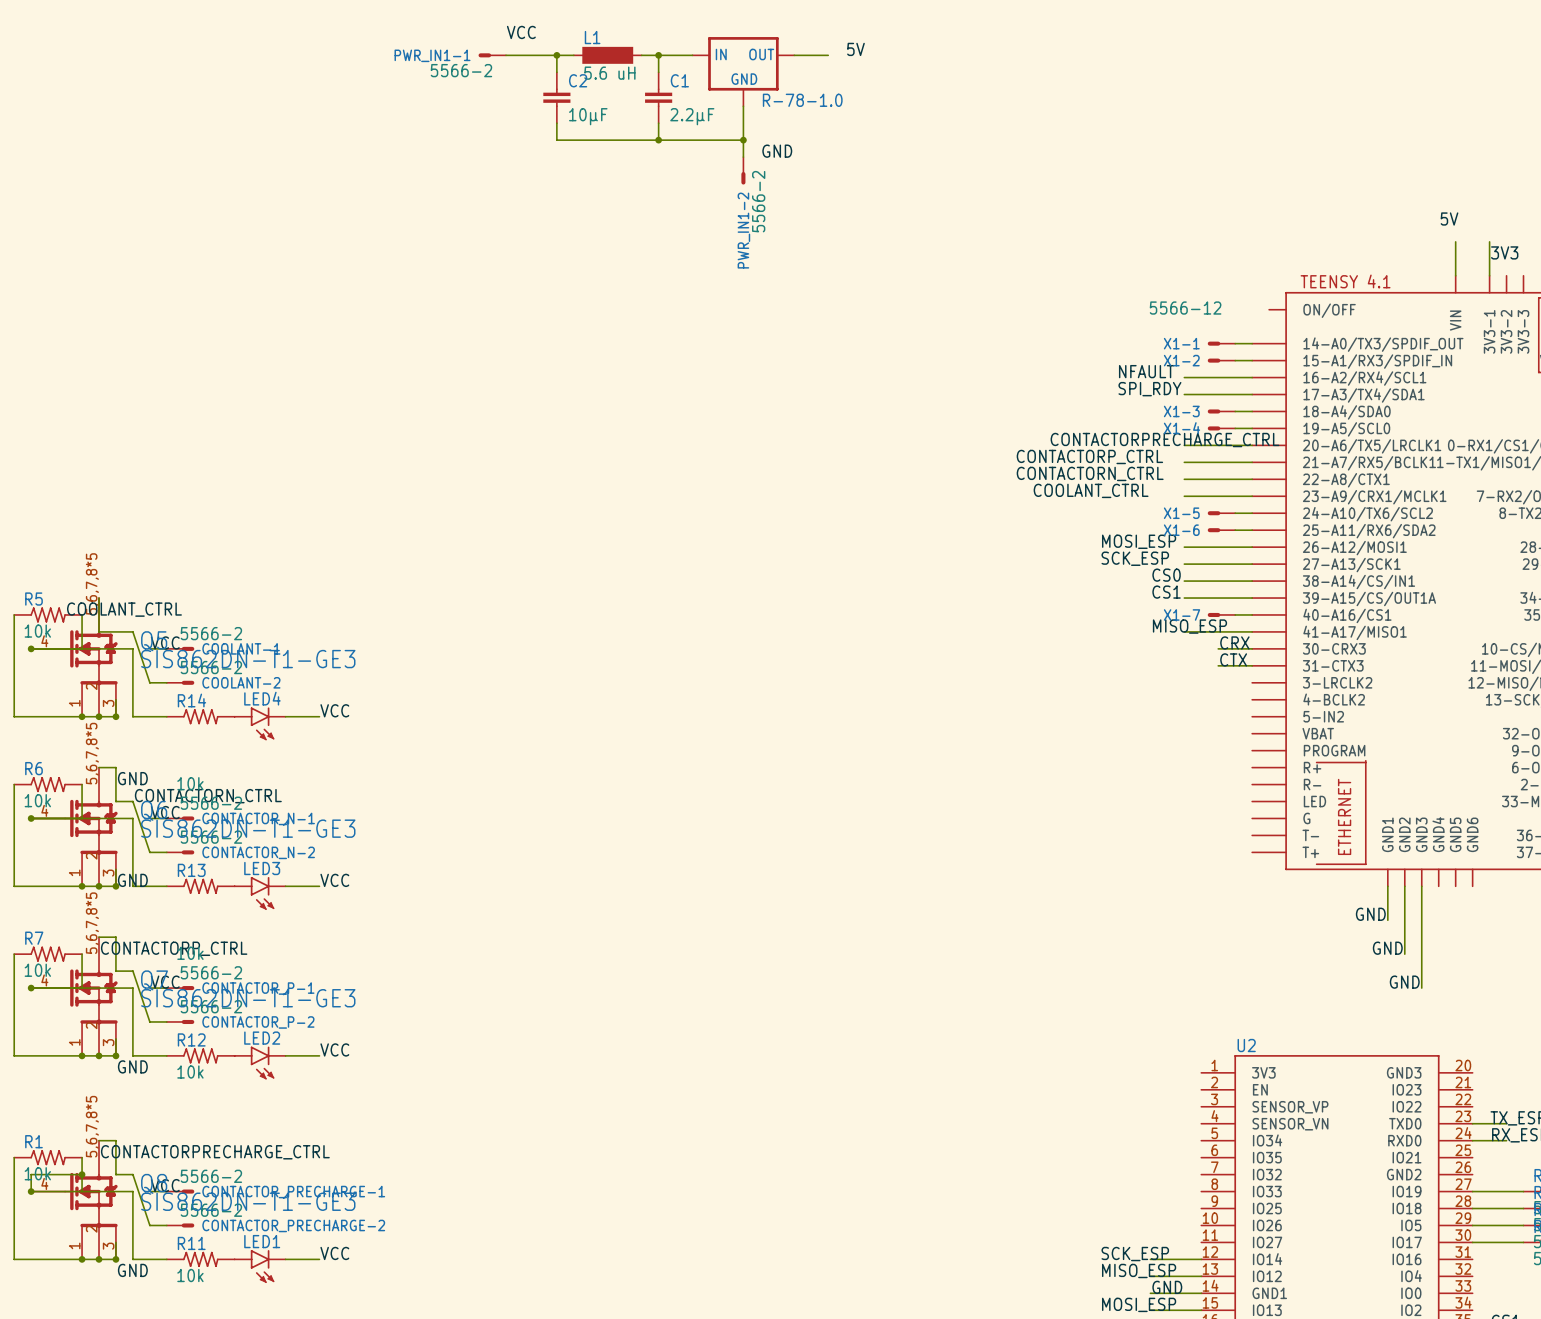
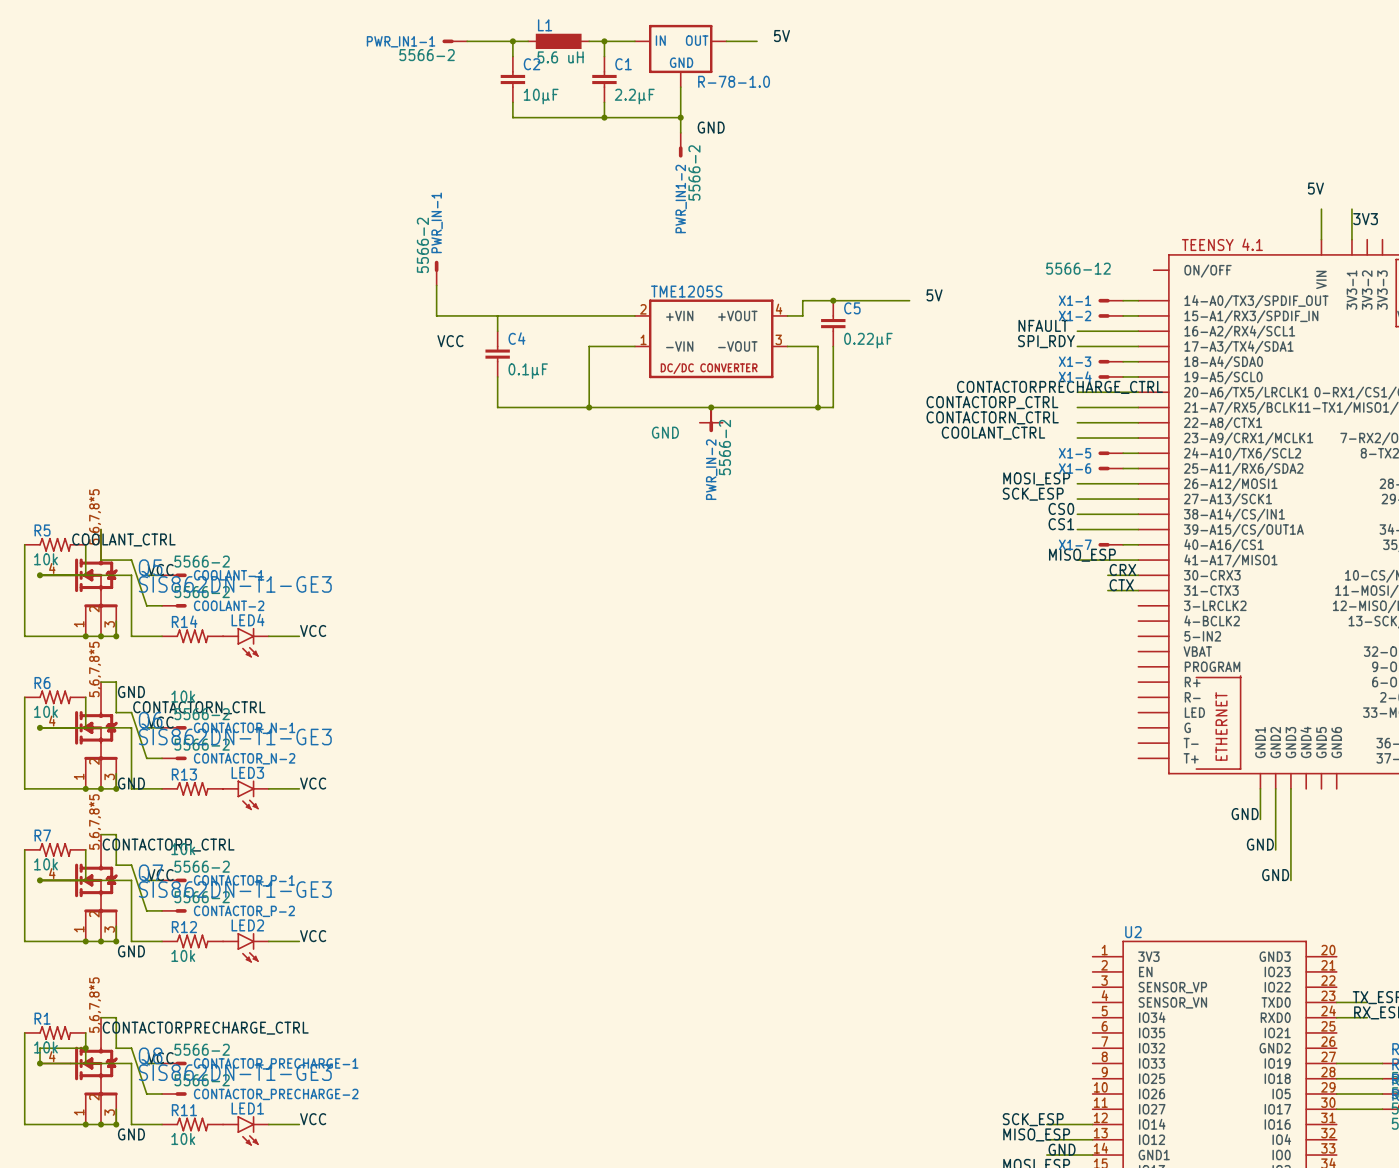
label: VCC (521, 32) -> none
PWR_IN-1: none -> 5566-2 (436, 273)
wire: none -> (436, 285) (436, 315) (634, 315)
label: none -> 5V (934, 295)
junction: none -> (833, 300)
wire: none -> (909, 300) (802, 300) (802, 315) (787, 315)
wire: none -> (497, 315) (497, 331)
C5: none -> 0.22μF (833, 323)
TME1205S: none -> (711, 338)
label: none -> VCC (450, 341)
wire: none -> (634, 346) (589, 346) (589, 407)
wire: none -> (787, 346) (818, 346) (818, 407)
wire: none -> (833, 346) (833, 407) (497, 407) (497, 376)
C4: none -> 0.1μF (497, 354)
junction: none -> (589, 407)
junction: none -> (711, 407)
junction: none -> (818, 407)
power symbol: none -> GND (711, 415)
PWR_IN-2: none -> 5566-2 (711, 419)

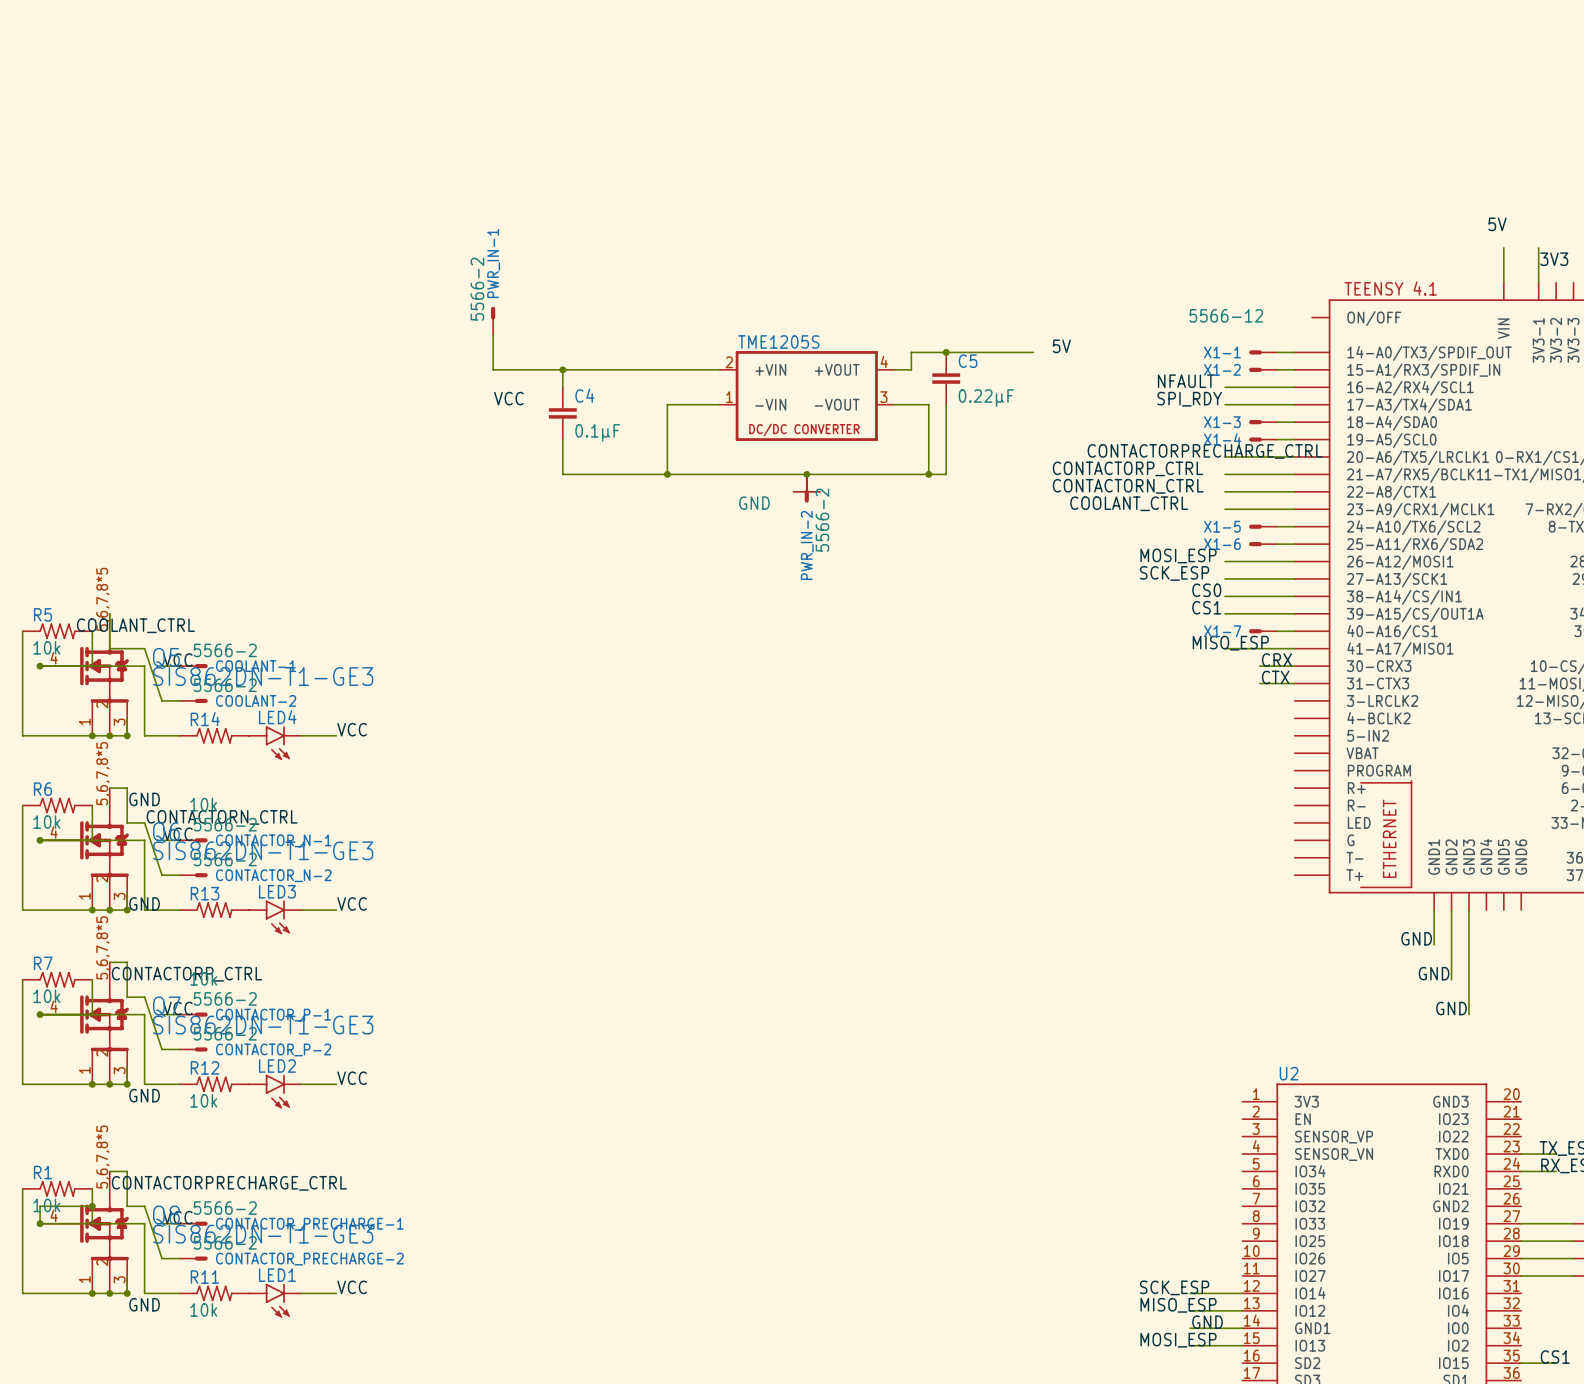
label: 5V (781, 36) -> none
PWR_IN1-1: 5566-2 (454, 41) -> none
wire: (467, 41) (528, 41) -> none
wire: (512, 41) (512, 56) -> none
junction: (512, 41) -> none
L1: 5.6 uH (558, 41) -> none
wire: (589, 41) (634, 41) -> none
wire: (604, 41) (604, 56) -> none
junction: (604, 41) -> none
wire: (726, 41) (757, 41) -> none
R-78-1.0: (680, 56) -> none
C2: 10μF (512, 79) -> none
C1: 2.2μF (604, 79) -> none
wire: (680, 87) (680, 132) -> none
wire: (512, 102) (512, 117) (680, 117) -> none
wire: (604, 102) (604, 117) -> none
junction: (604, 117) -> none
junction: (680, 117) -> none
label: GND (711, 127) -> none
PWR_IN1-2: 5566-2 (680, 145) -> none
junction: none -> (562, 369)

